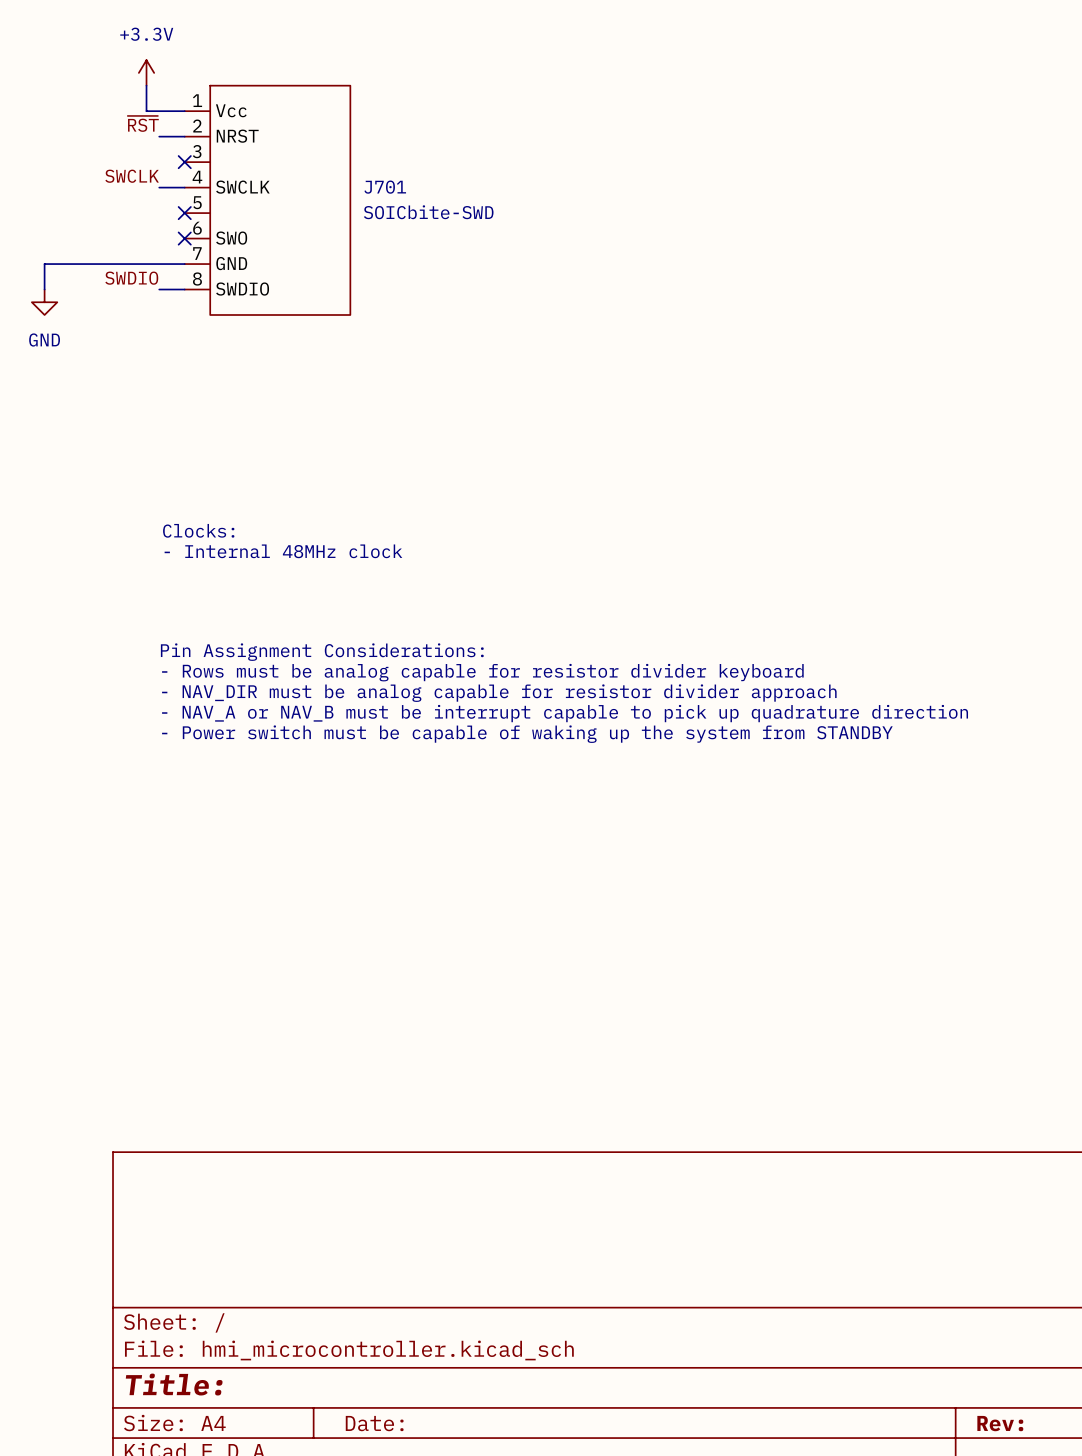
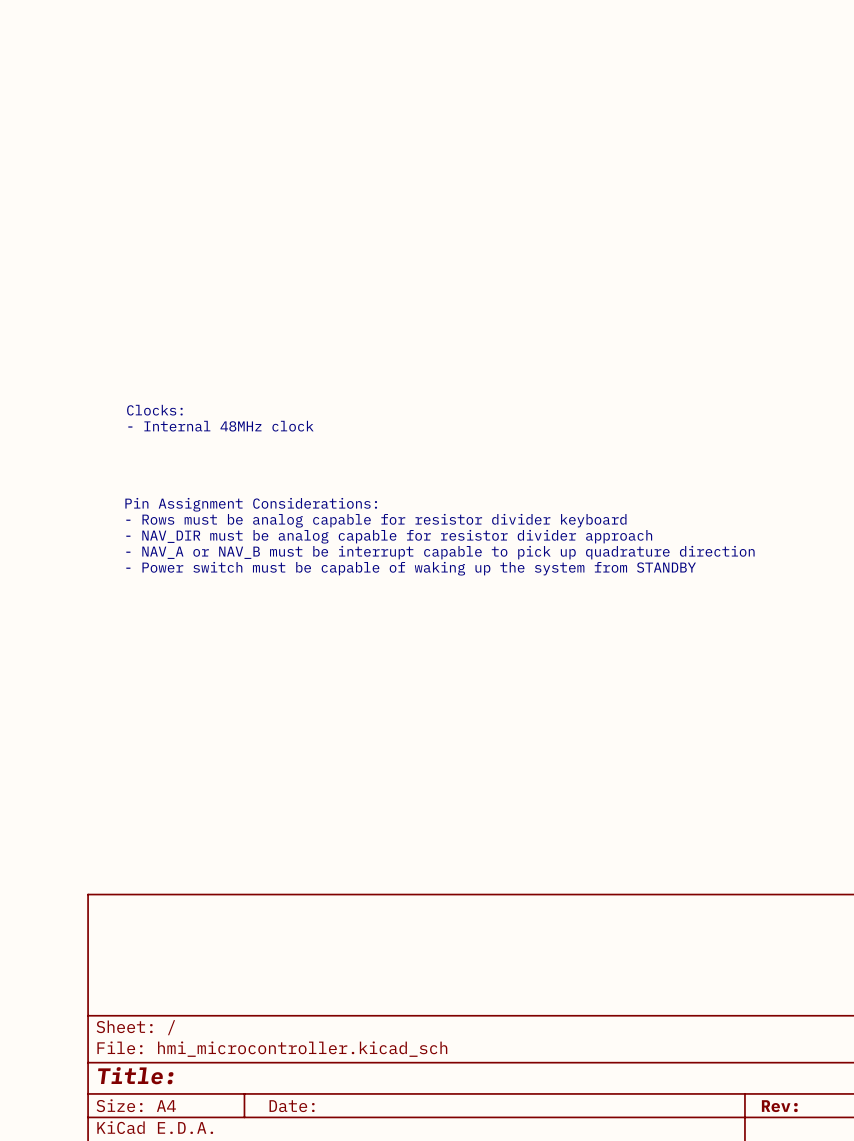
power symbol: +3.3V (146, 72) -> none
wire: (146, 85) (146, 111) (184, 111) -> none
label: ~{RST} (143, 123) -> none
wire: (159, 136) (184, 136) -> none
no-connect mark: (184, 162) -> none
label: SWCLK (132, 176) -> none
wire: (159, 187) (184, 187) -> none
J701: SOICbite-SWD (267, 200) -> none
no-connect mark: (184, 213) -> none
no-connect mark: (184, 238) -> none
wire: (184, 264) (44, 264) (44, 289) -> none
label: SWDIO (131, 278) -> none
wire: (159, 289) (184, 289) -> none
power symbol: GND (44, 302) -> none

